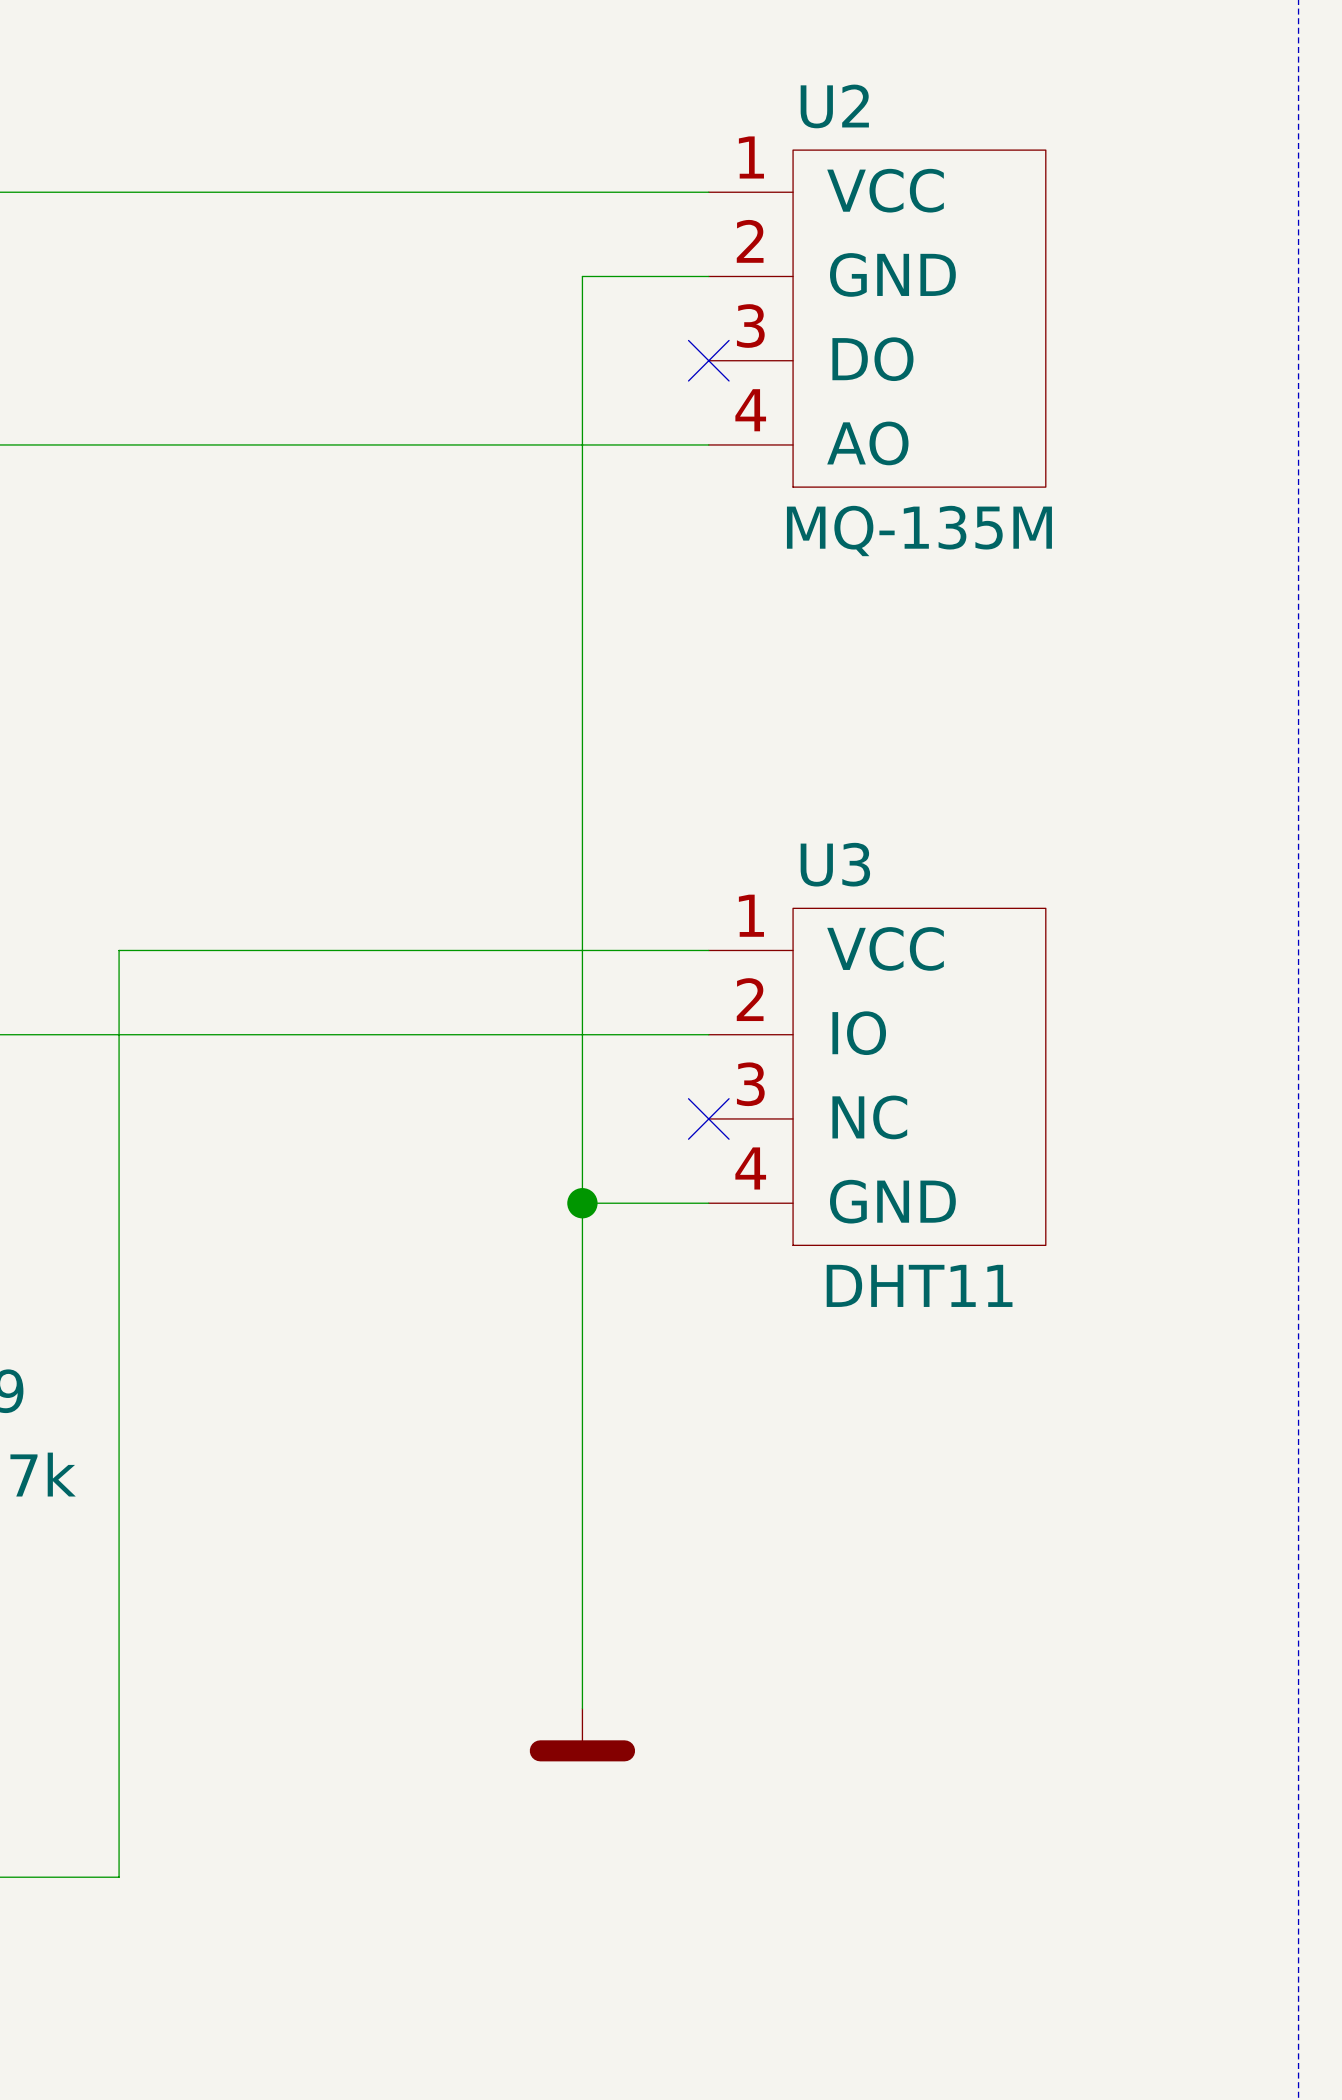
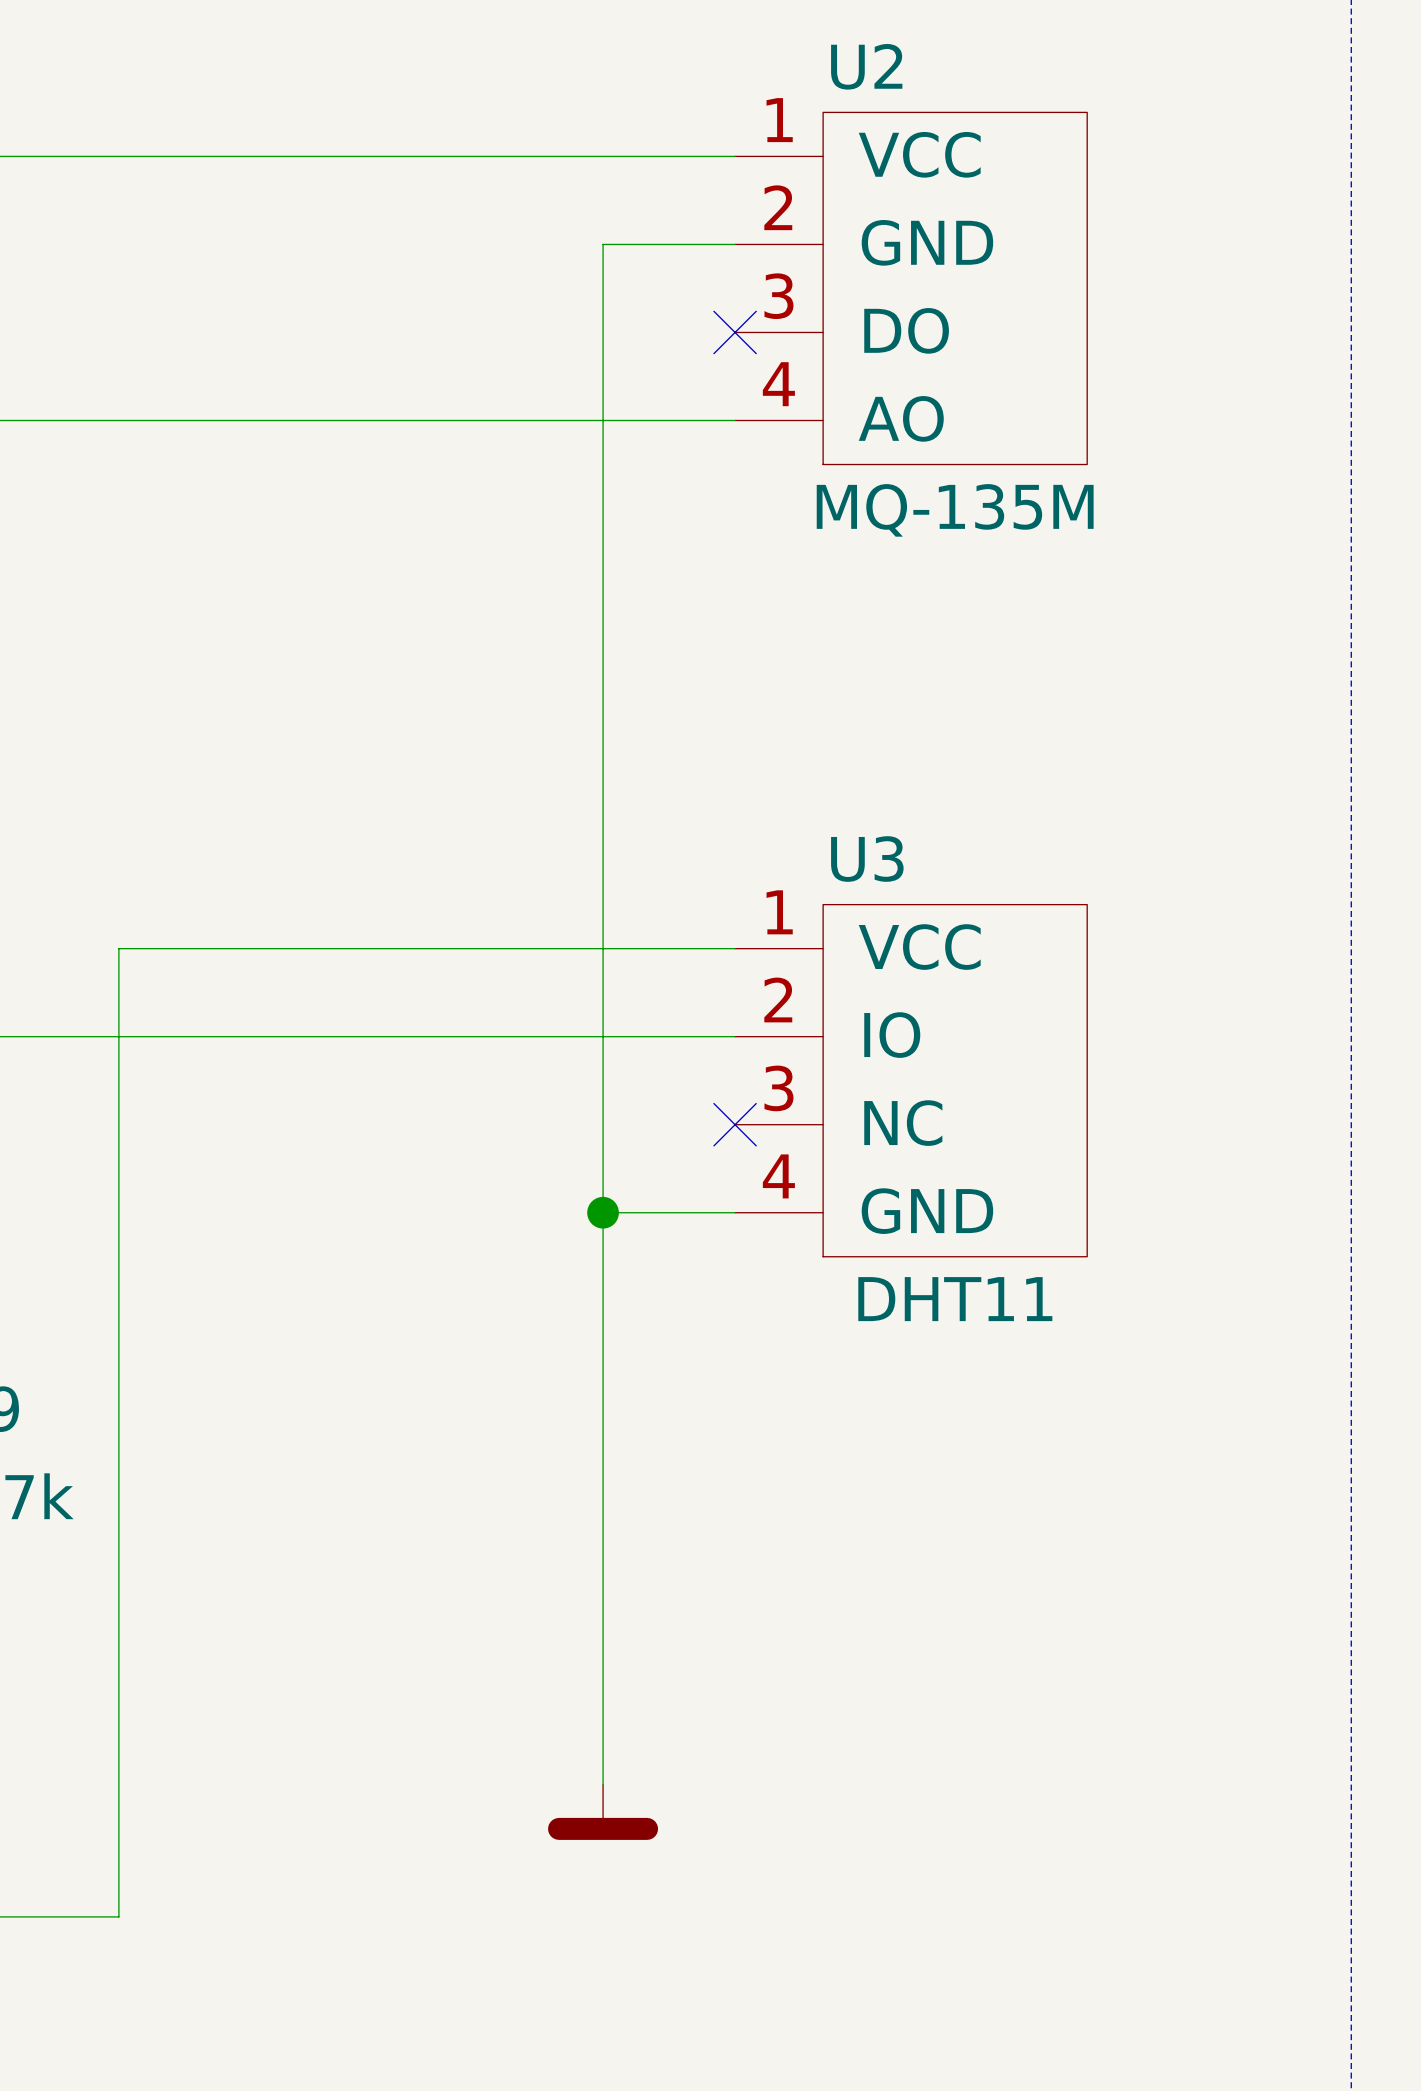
power symbol position: (582, 1735) -> (603, 1812)

